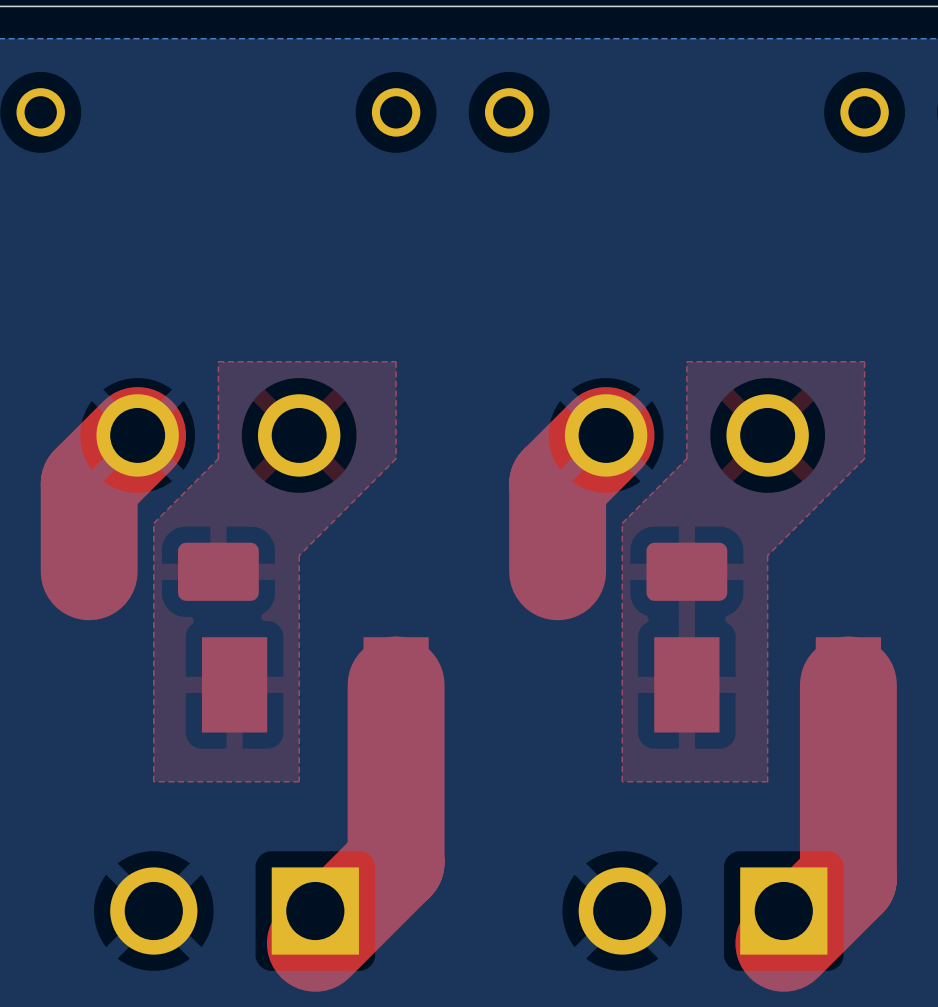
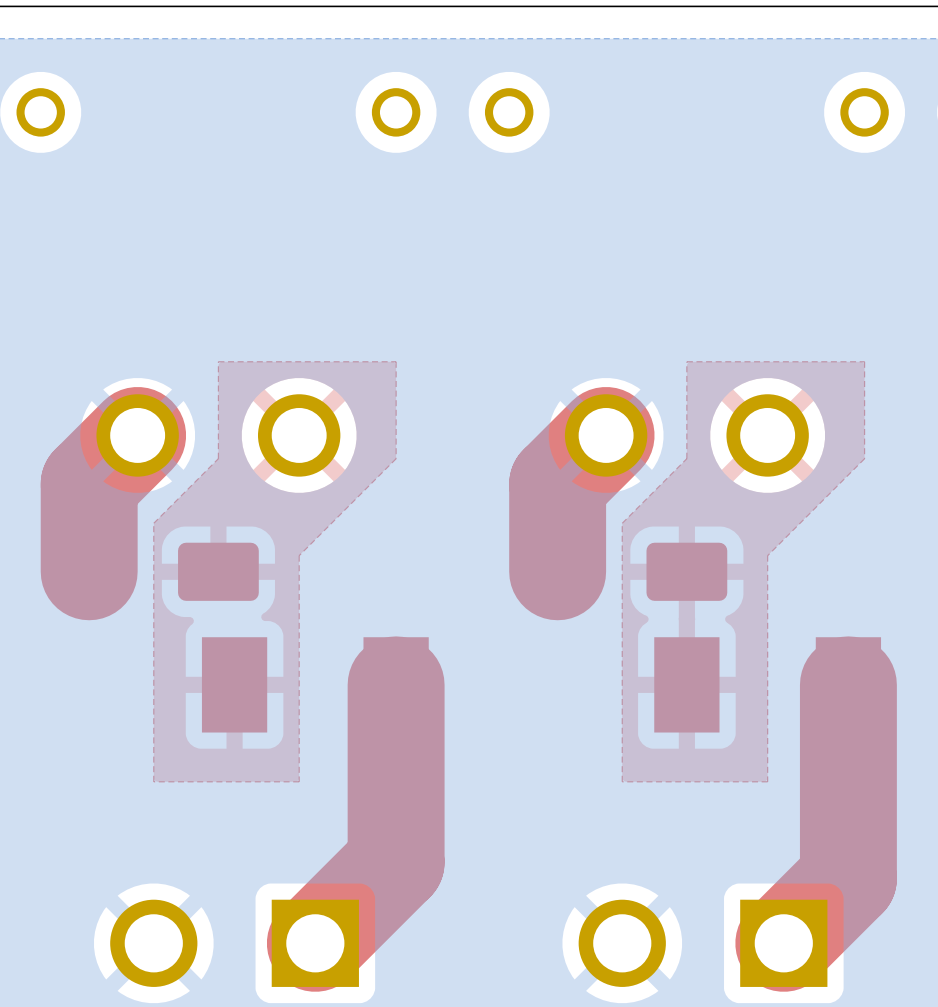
part position: (234, 911) -> (234, 943)
part position: (703, 911) -> (703, 943)

